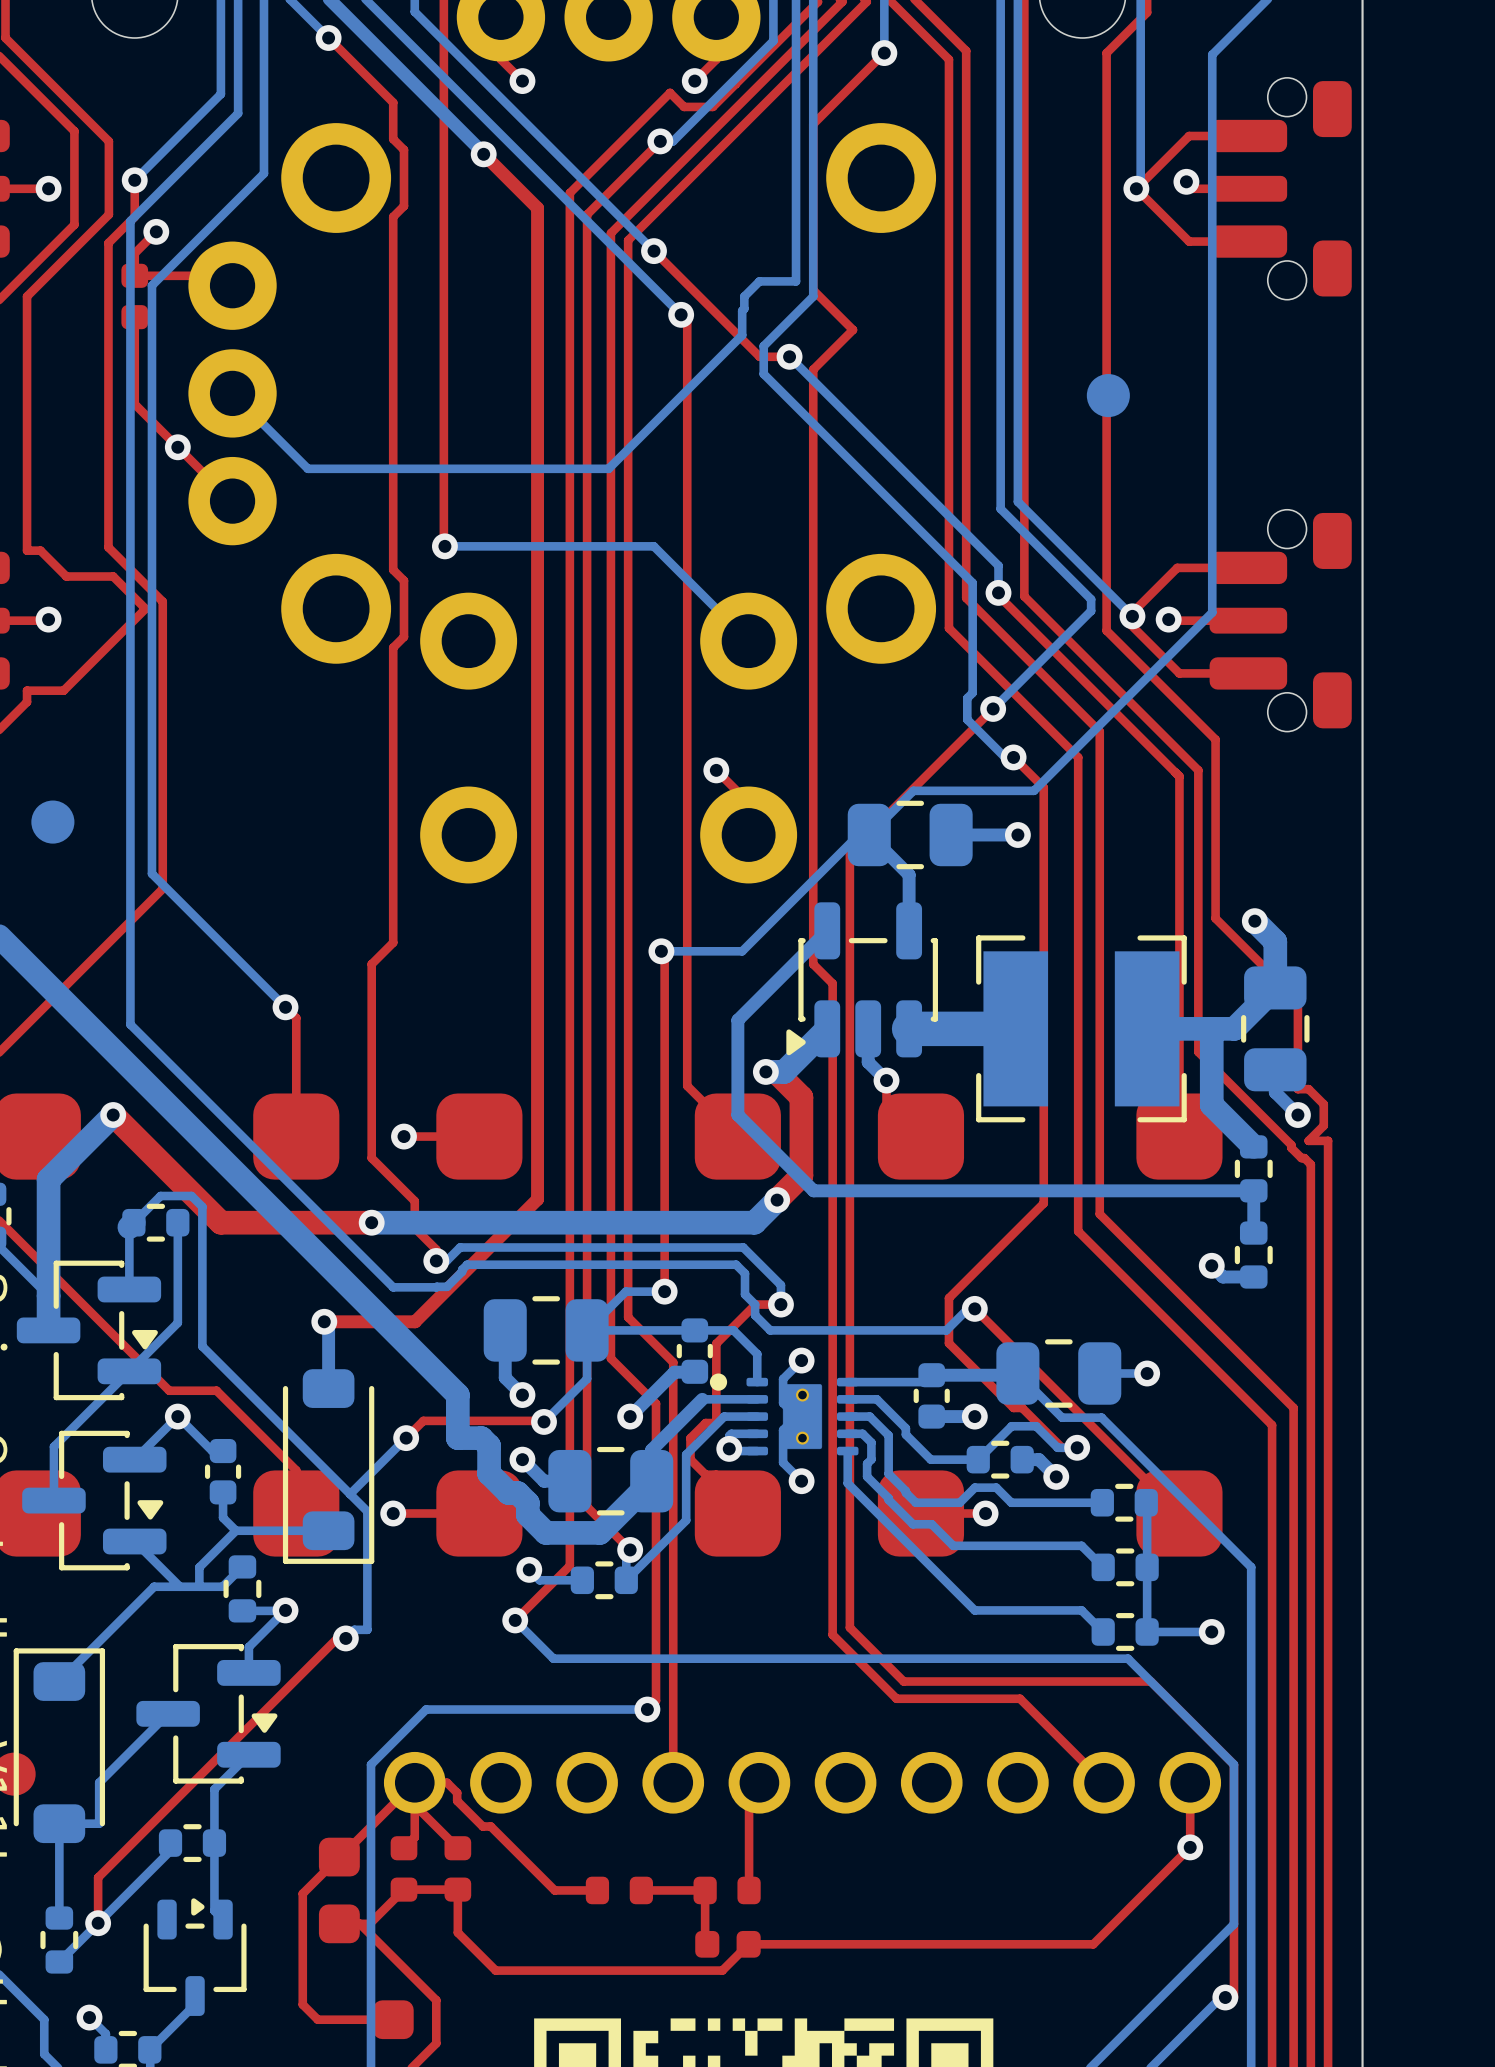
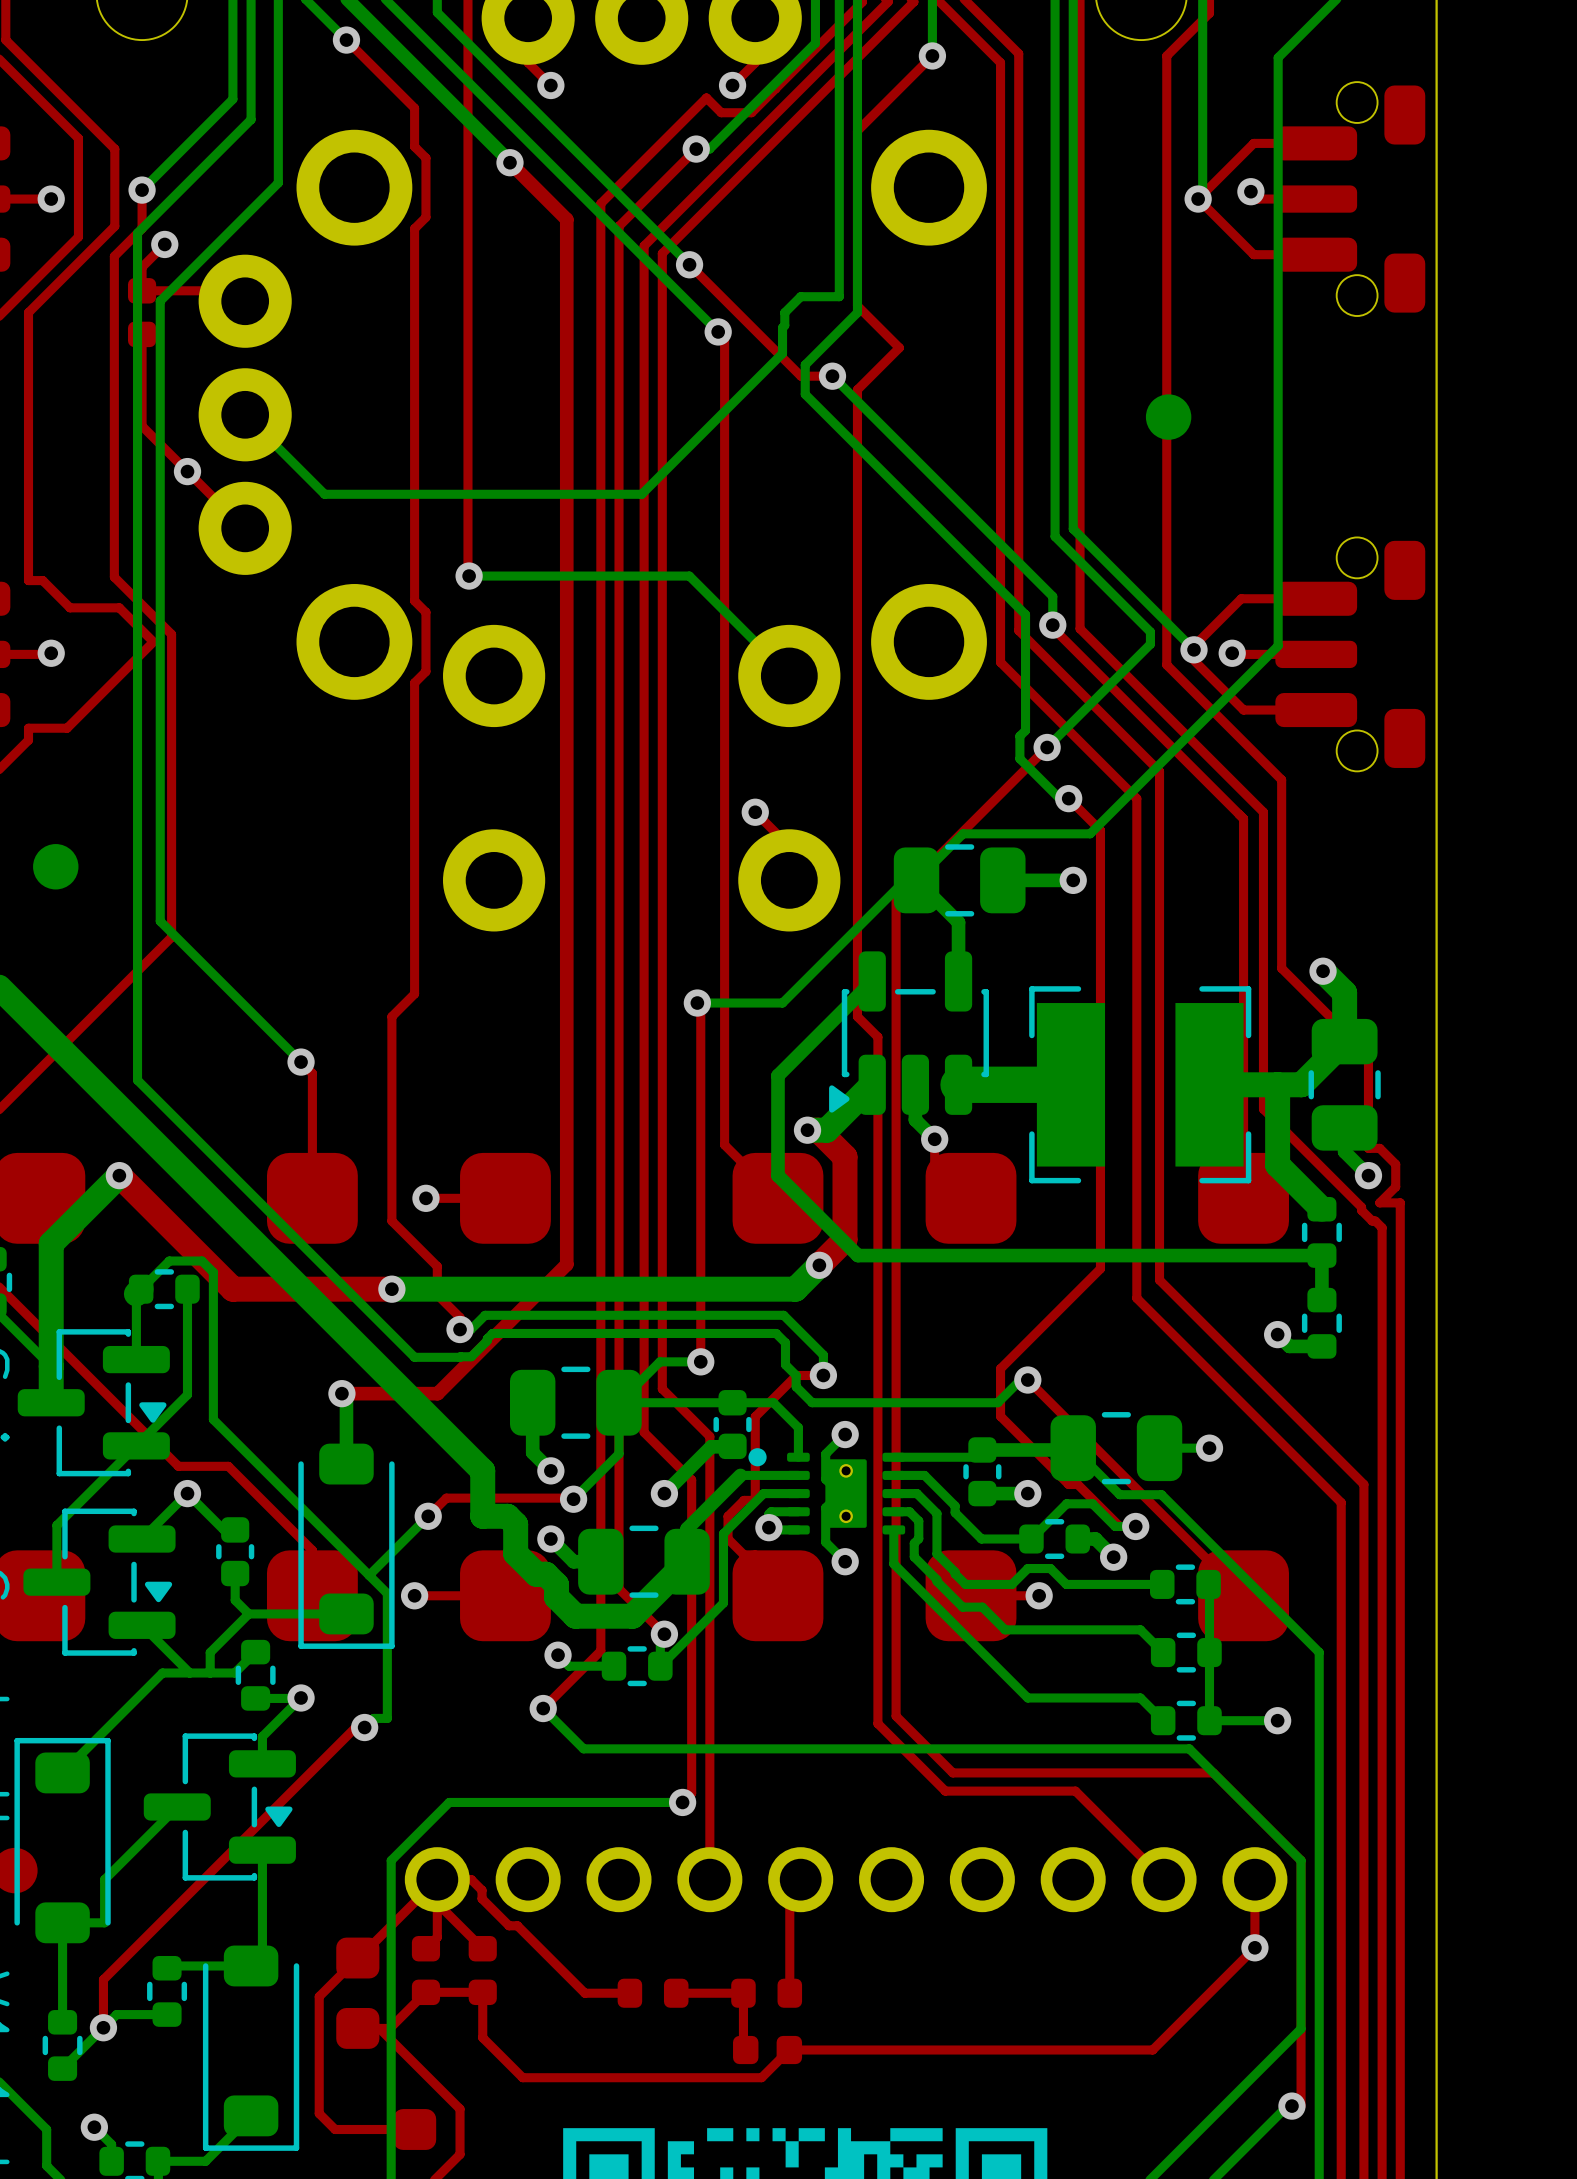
bottom track: (248, 1754) (214, 1789) (214, 1910) (223, 1919) -> (262, 1850) (262, 1954) (251, 1965) (169, 1965) (167, 1968)
bottom track: (170, 1843) (170, 1850) (110, 1910) -> (167, 2014) (116, 2014)
part rotation: 0° (192, 1843) -> 90° clockwise (167, 1991)
part position: (192, 1843) -> (167, 1991)
part: none -> (251, 2048)
part: (195, 1957) -> none
bottom track: (195, 1996) (195, 2004) (149, 2049) -> (251, 2115) (205, 2161) (157, 2161)

